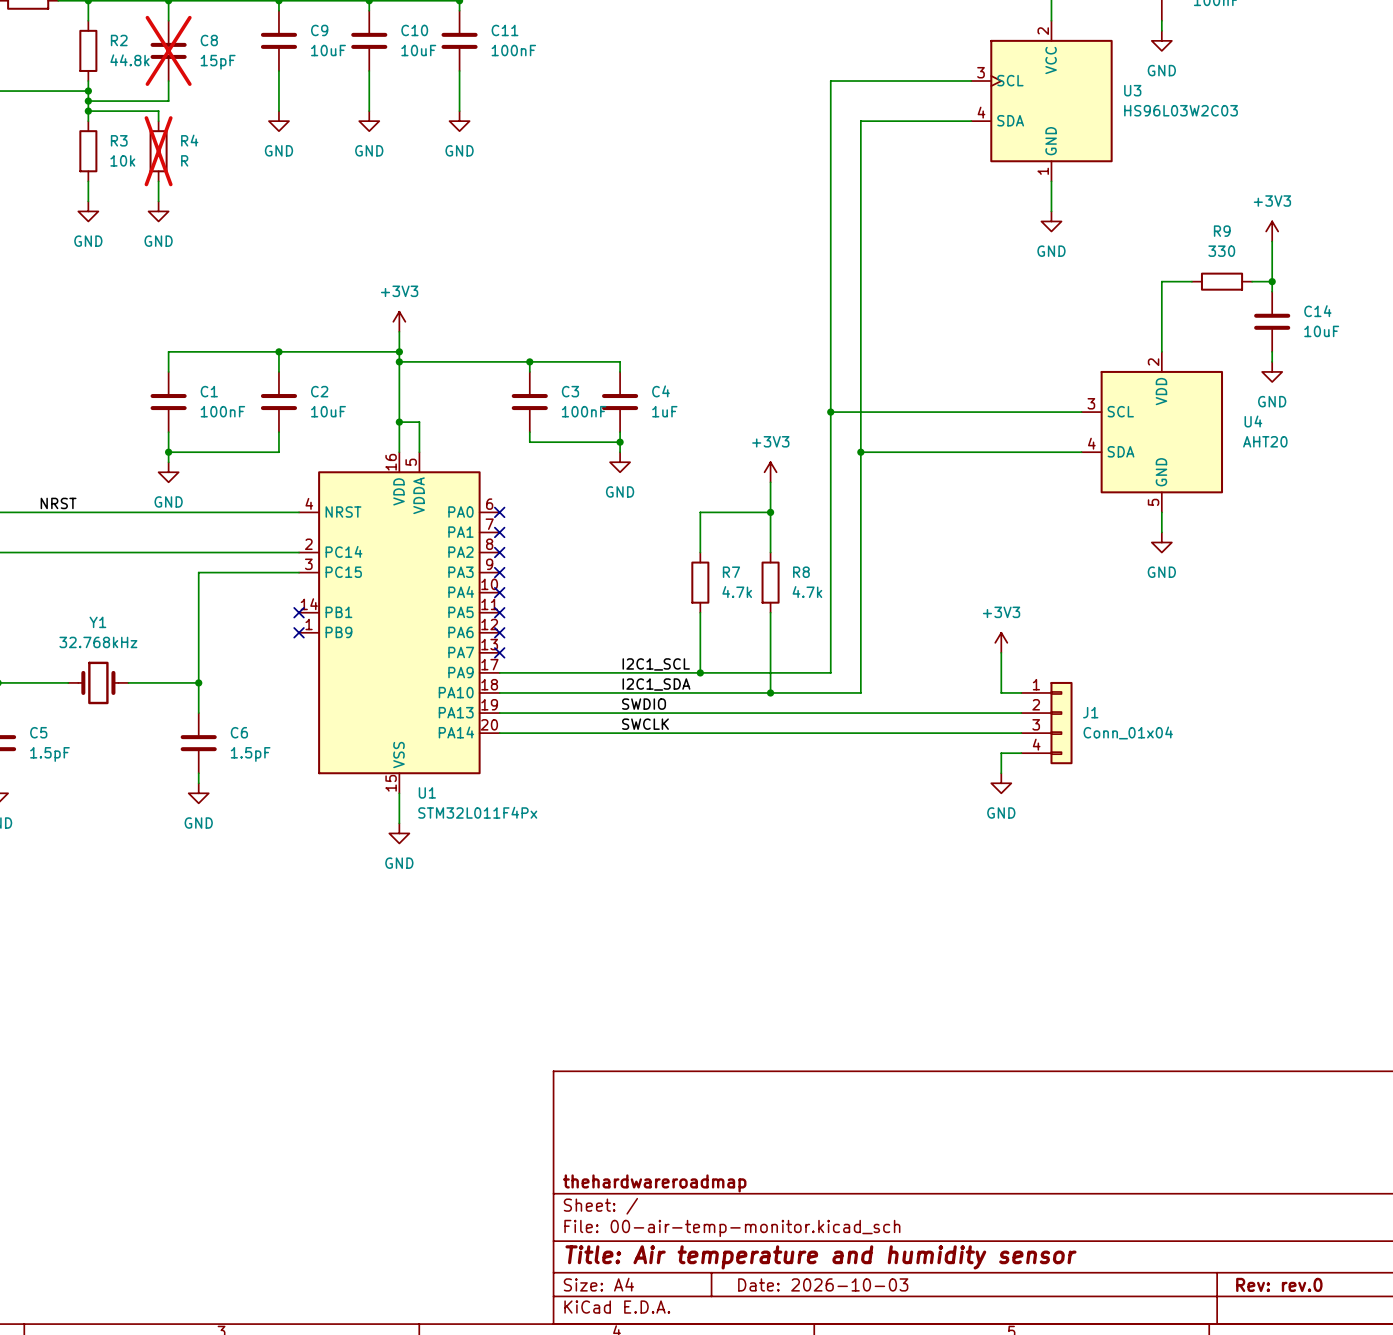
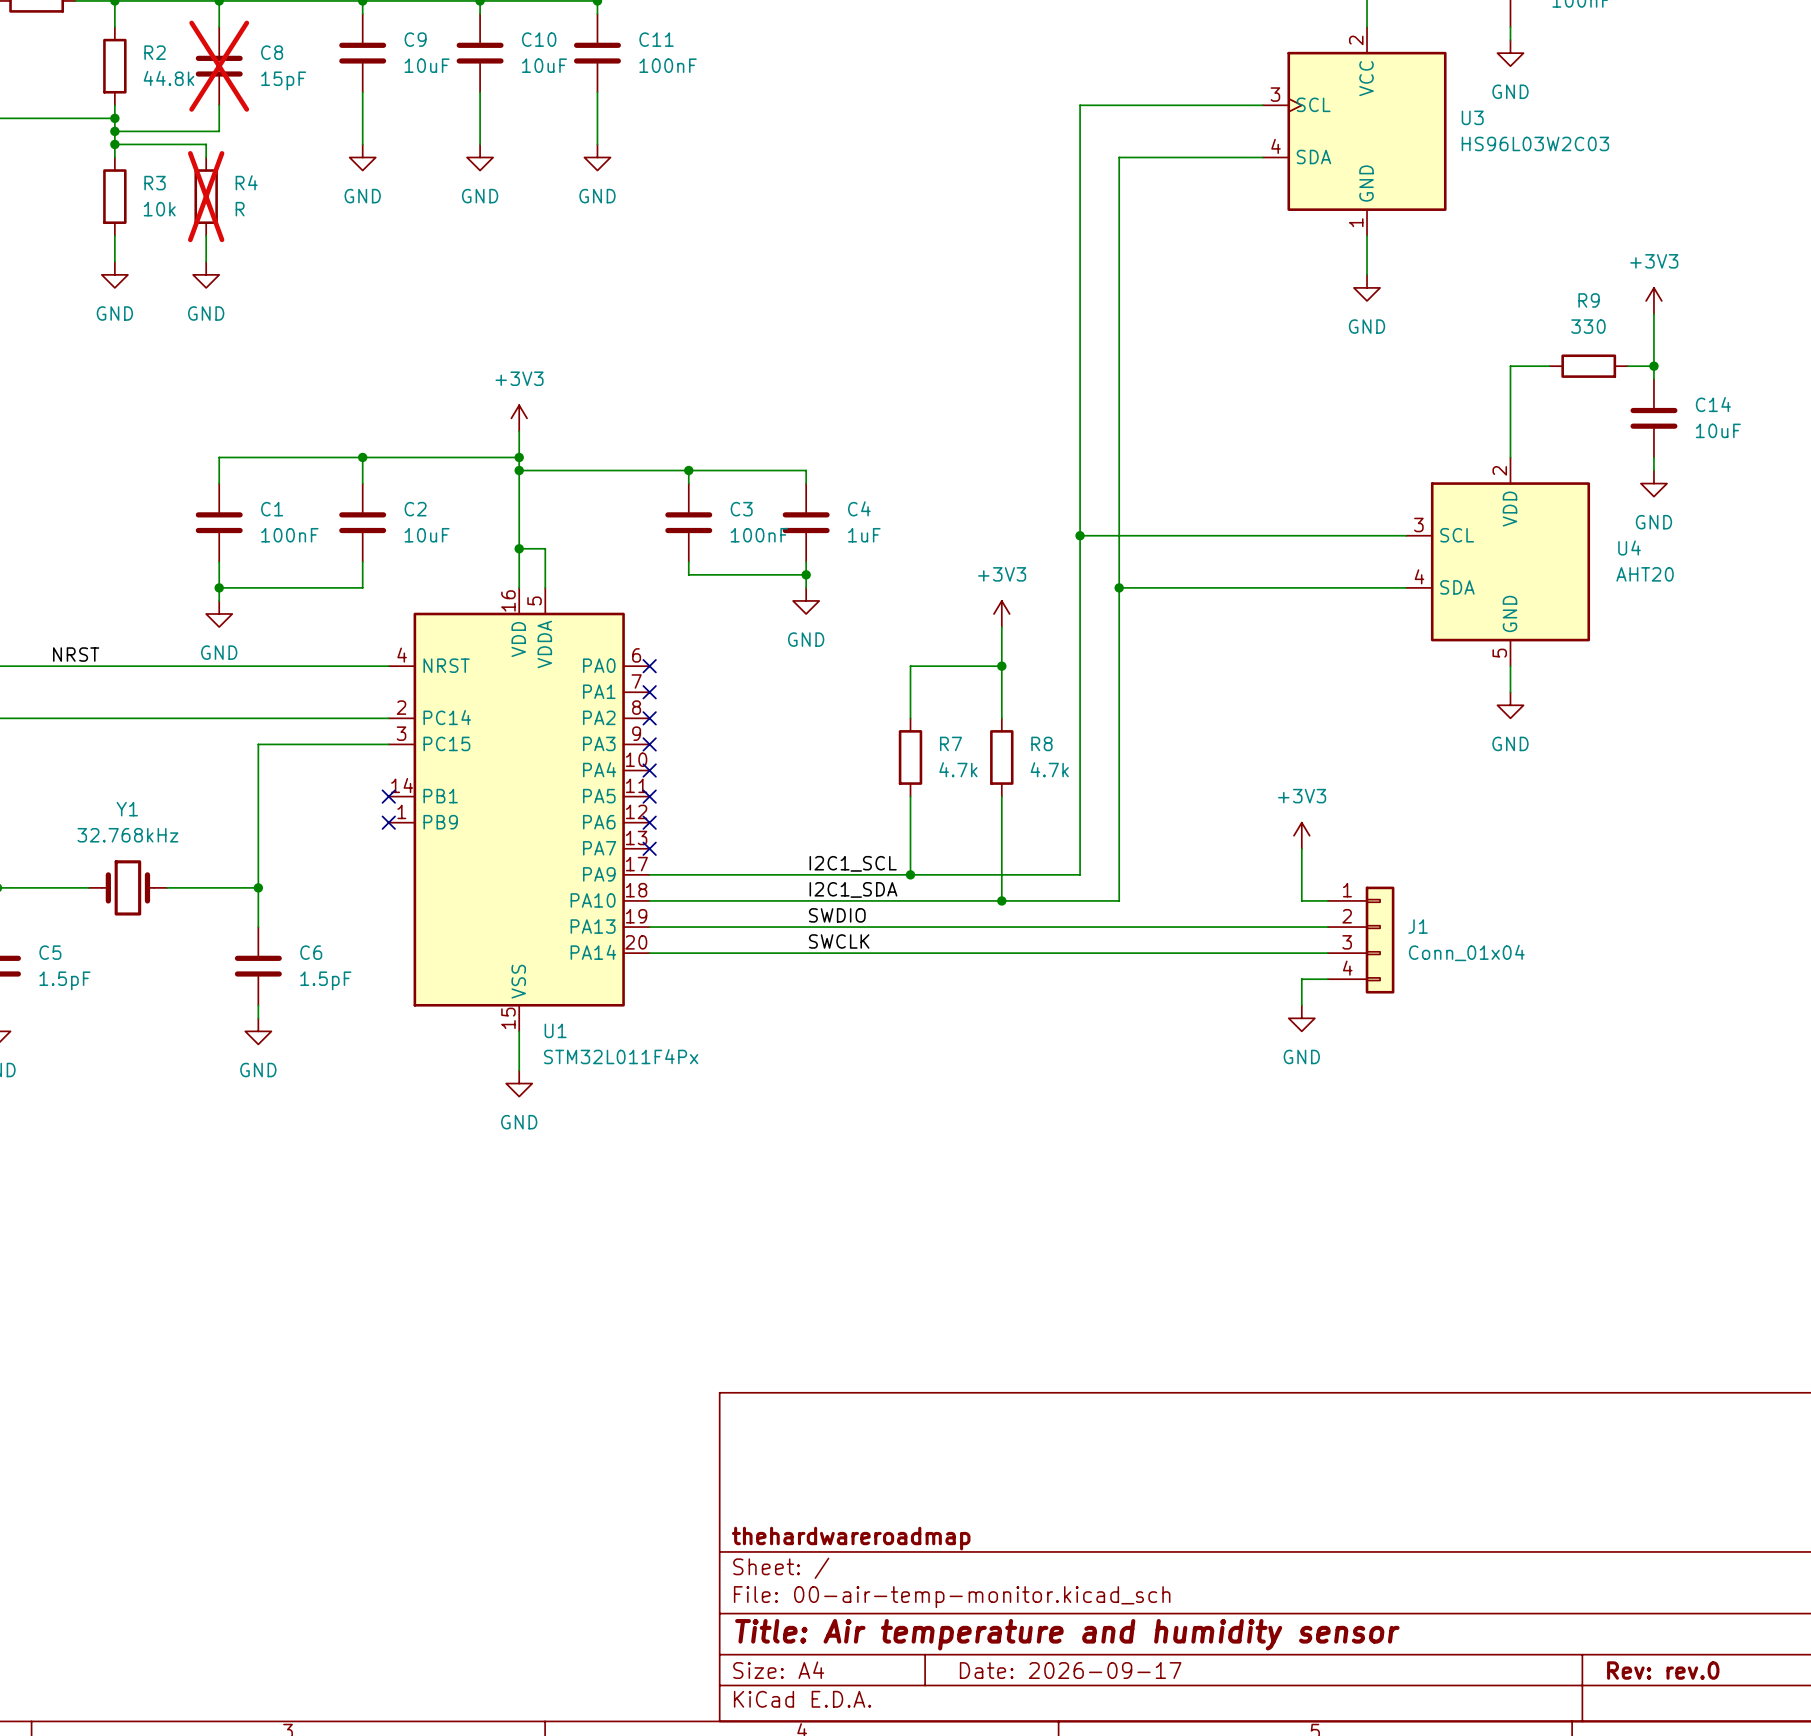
title block: Date: 2026-10-03 (823, 1284) -> Date: 2026-09-17 (1070, 1670)

